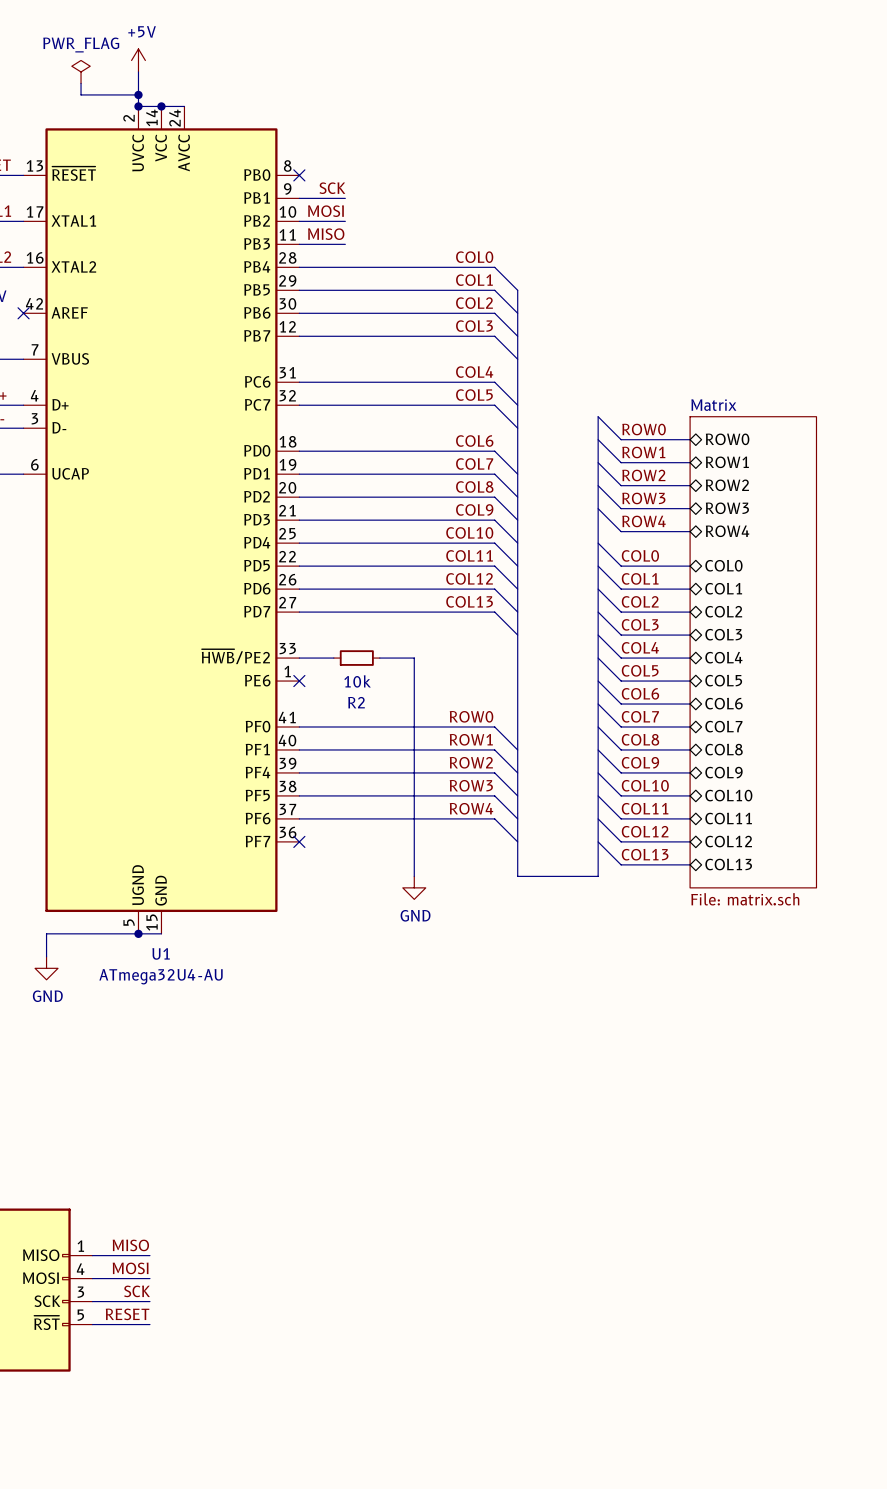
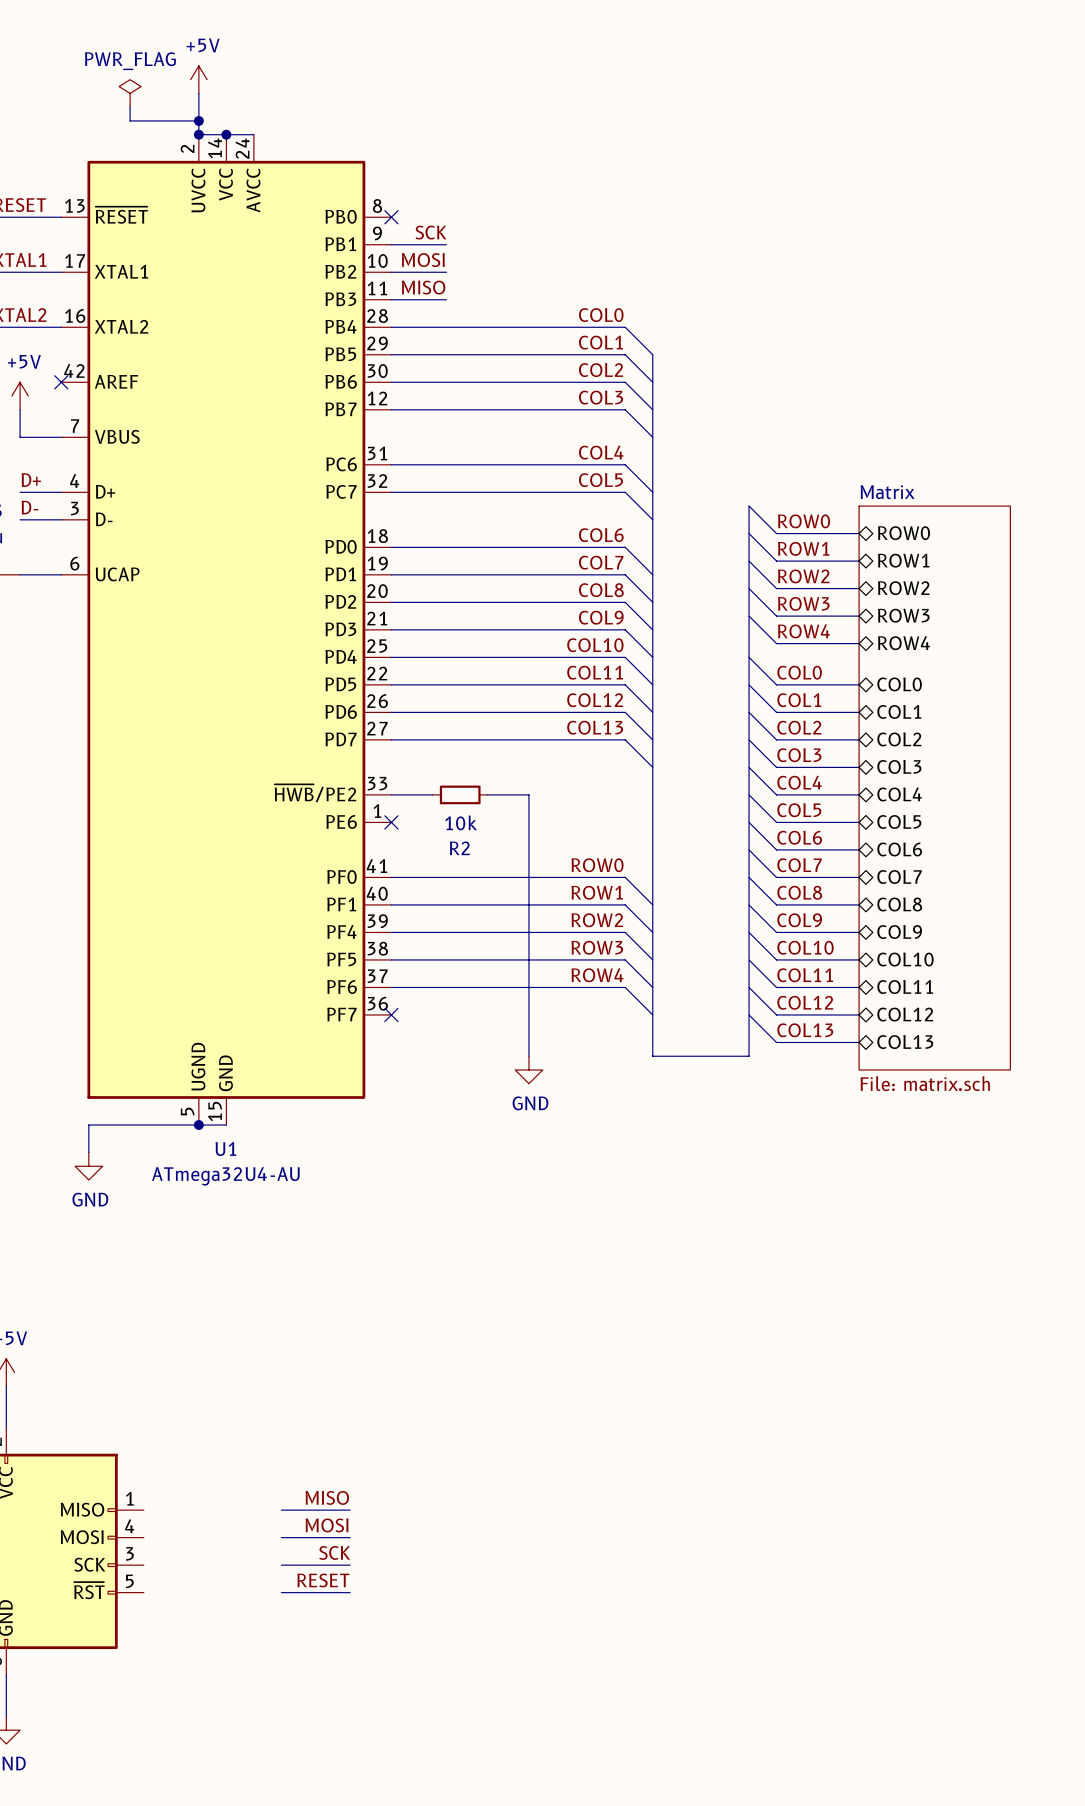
label position: MISO (130, 1245) -> MISO (327, 1497)
wire: (92, 1255) (149, 1255) -> (281, 1510) (350, 1510)
label position: MOSI (130, 1268) -> MOSI (326, 1525)
wire: (92, 1278) (149, 1278) -> (281, 1537) (350, 1537)
label position: SCK (137, 1291) -> SCK (334, 1552)
wire: (92, 1301) (149, 1301) -> (281, 1565) (350, 1565)
label position: RESET (127, 1314) -> RESET (323, 1580)
wire: (92, 1324) (149, 1324) -> (281, 1592) (350, 1592)

